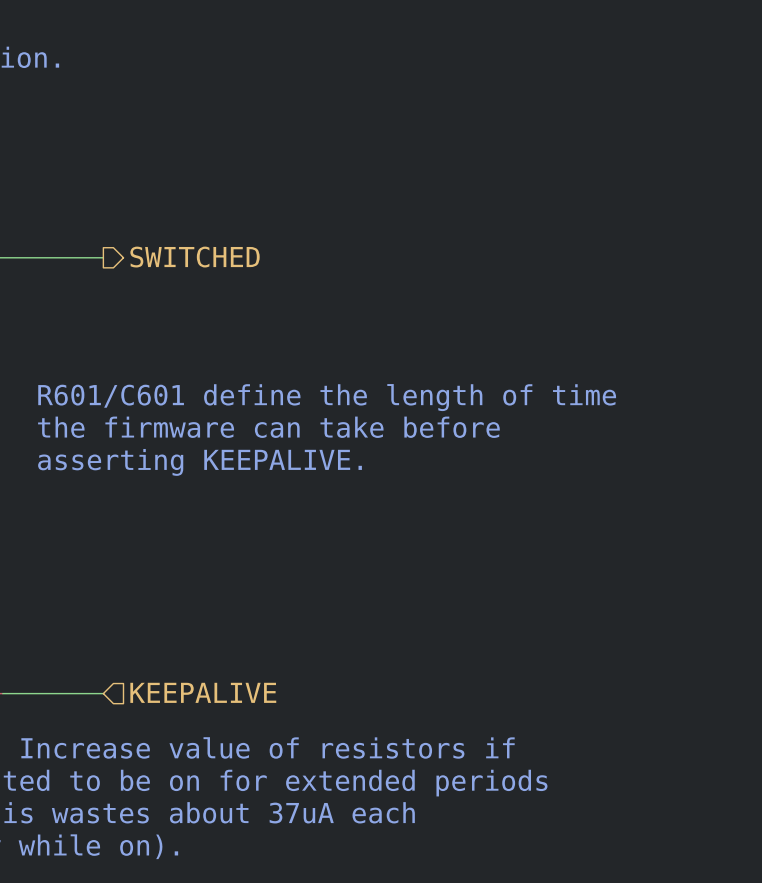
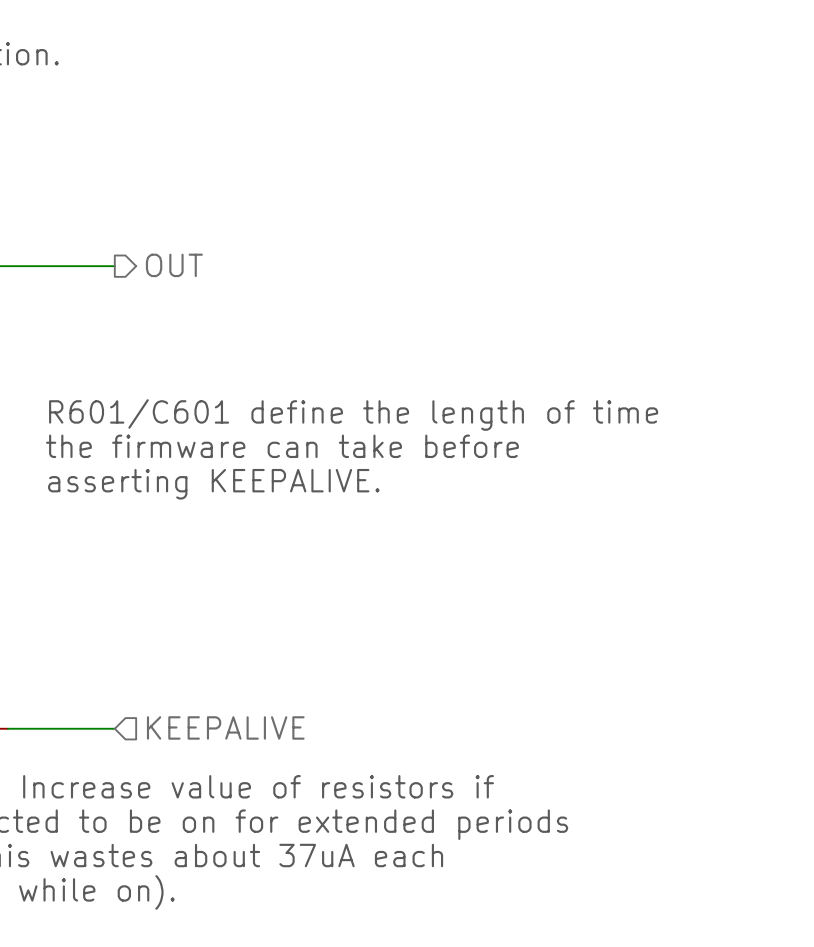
hierarchical label: SWITCHED (195, 257) -> OUT (174, 265)

